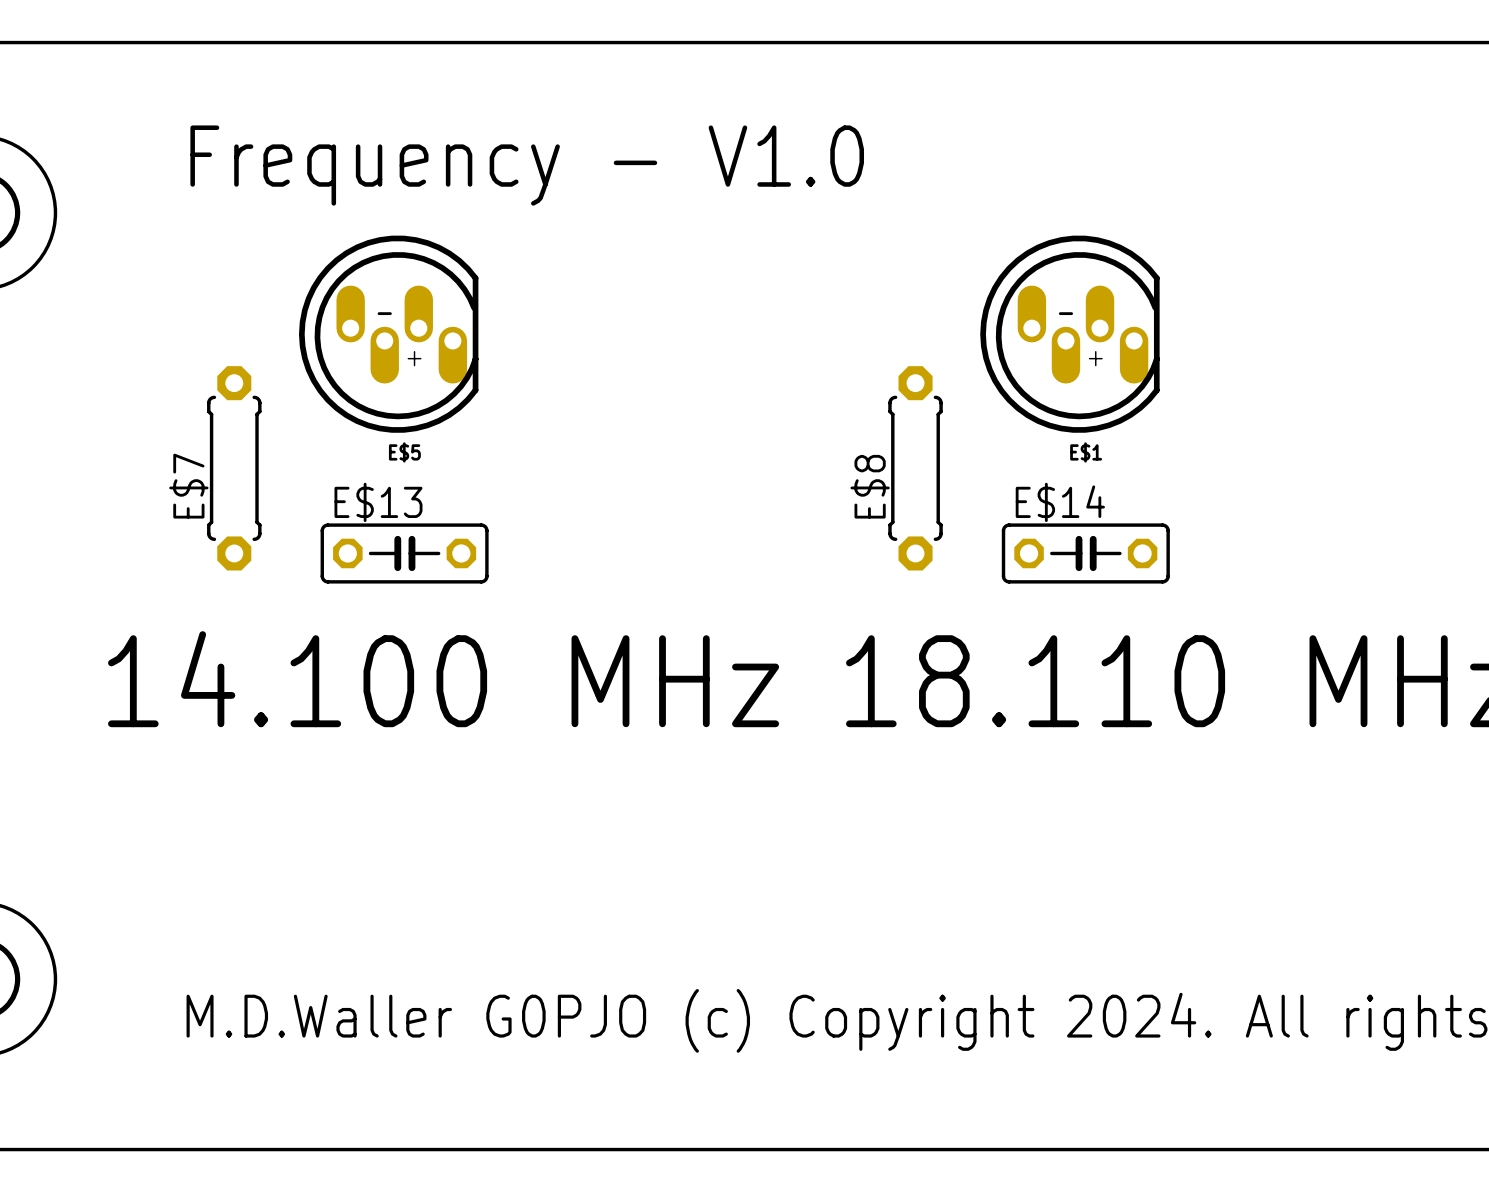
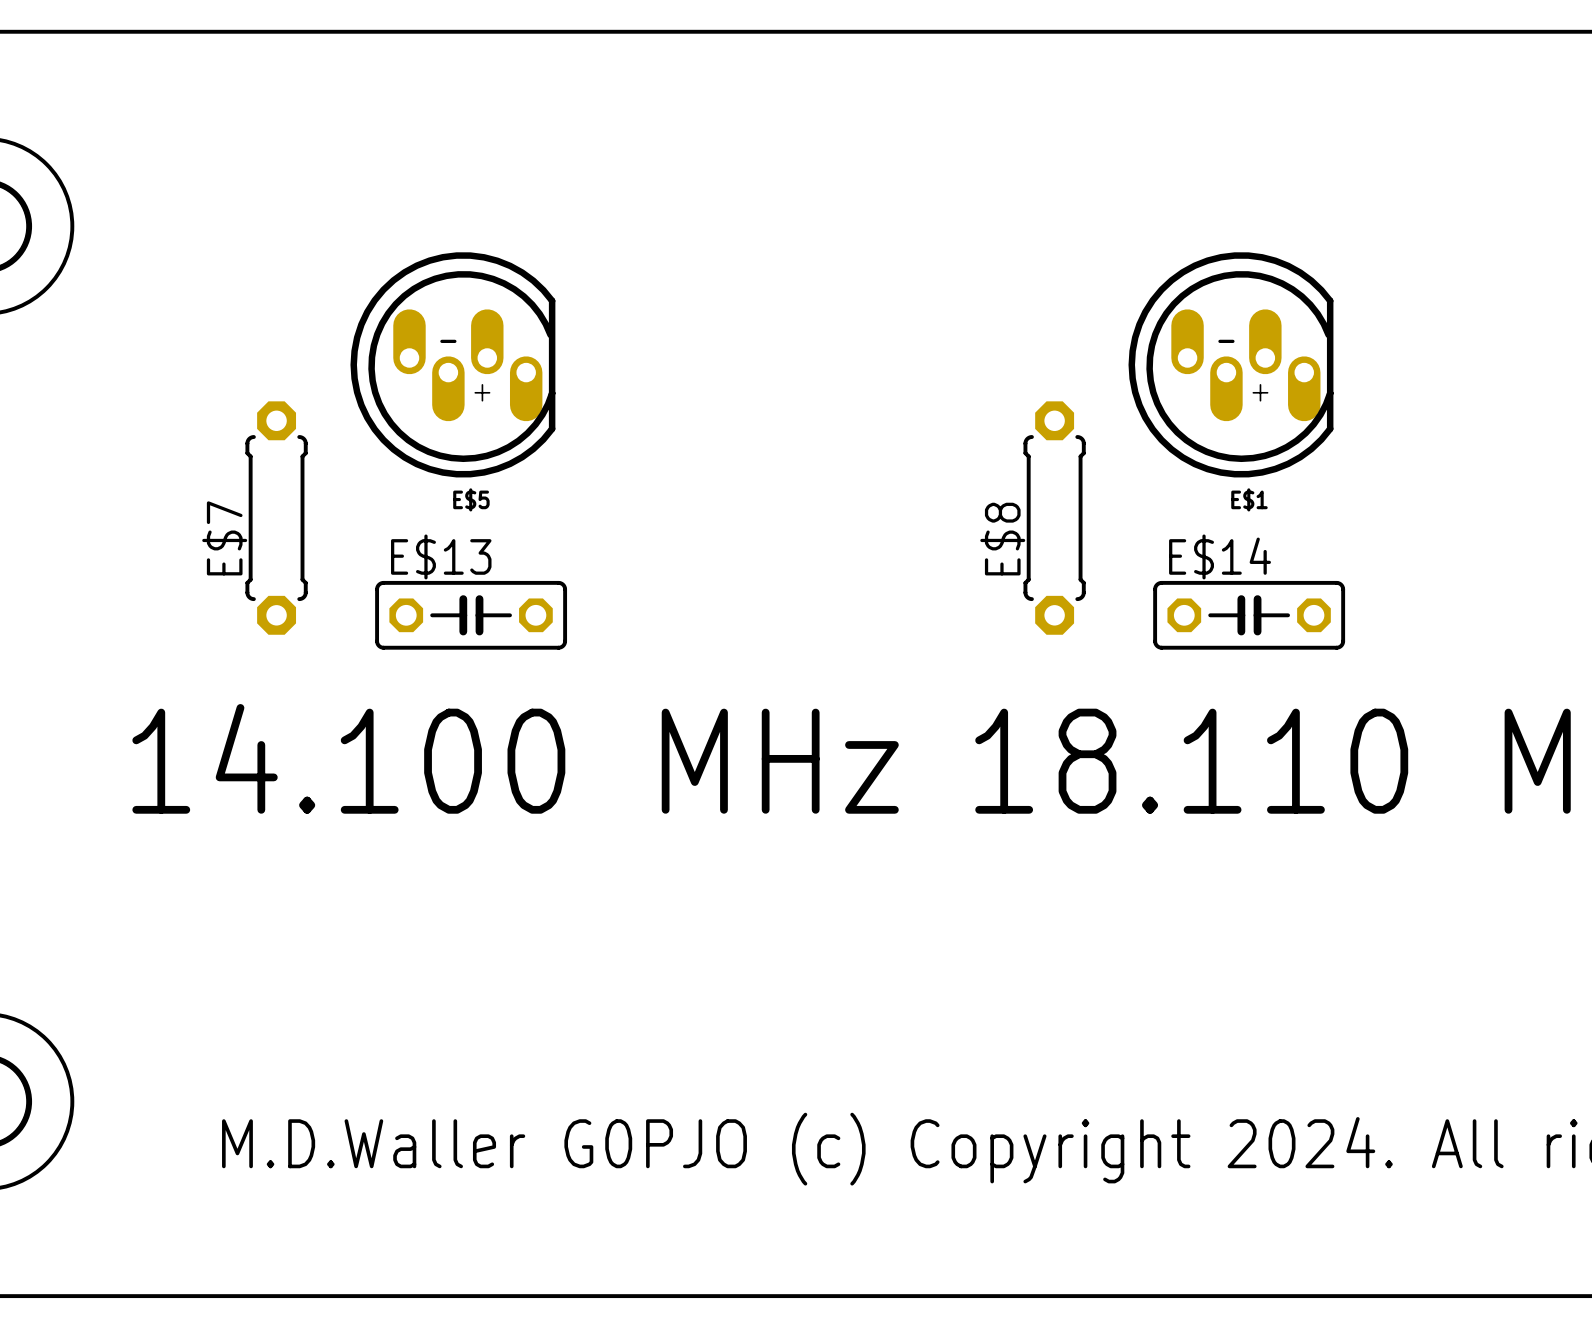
text: Frequency - V1.0 (527, 165) -> none

